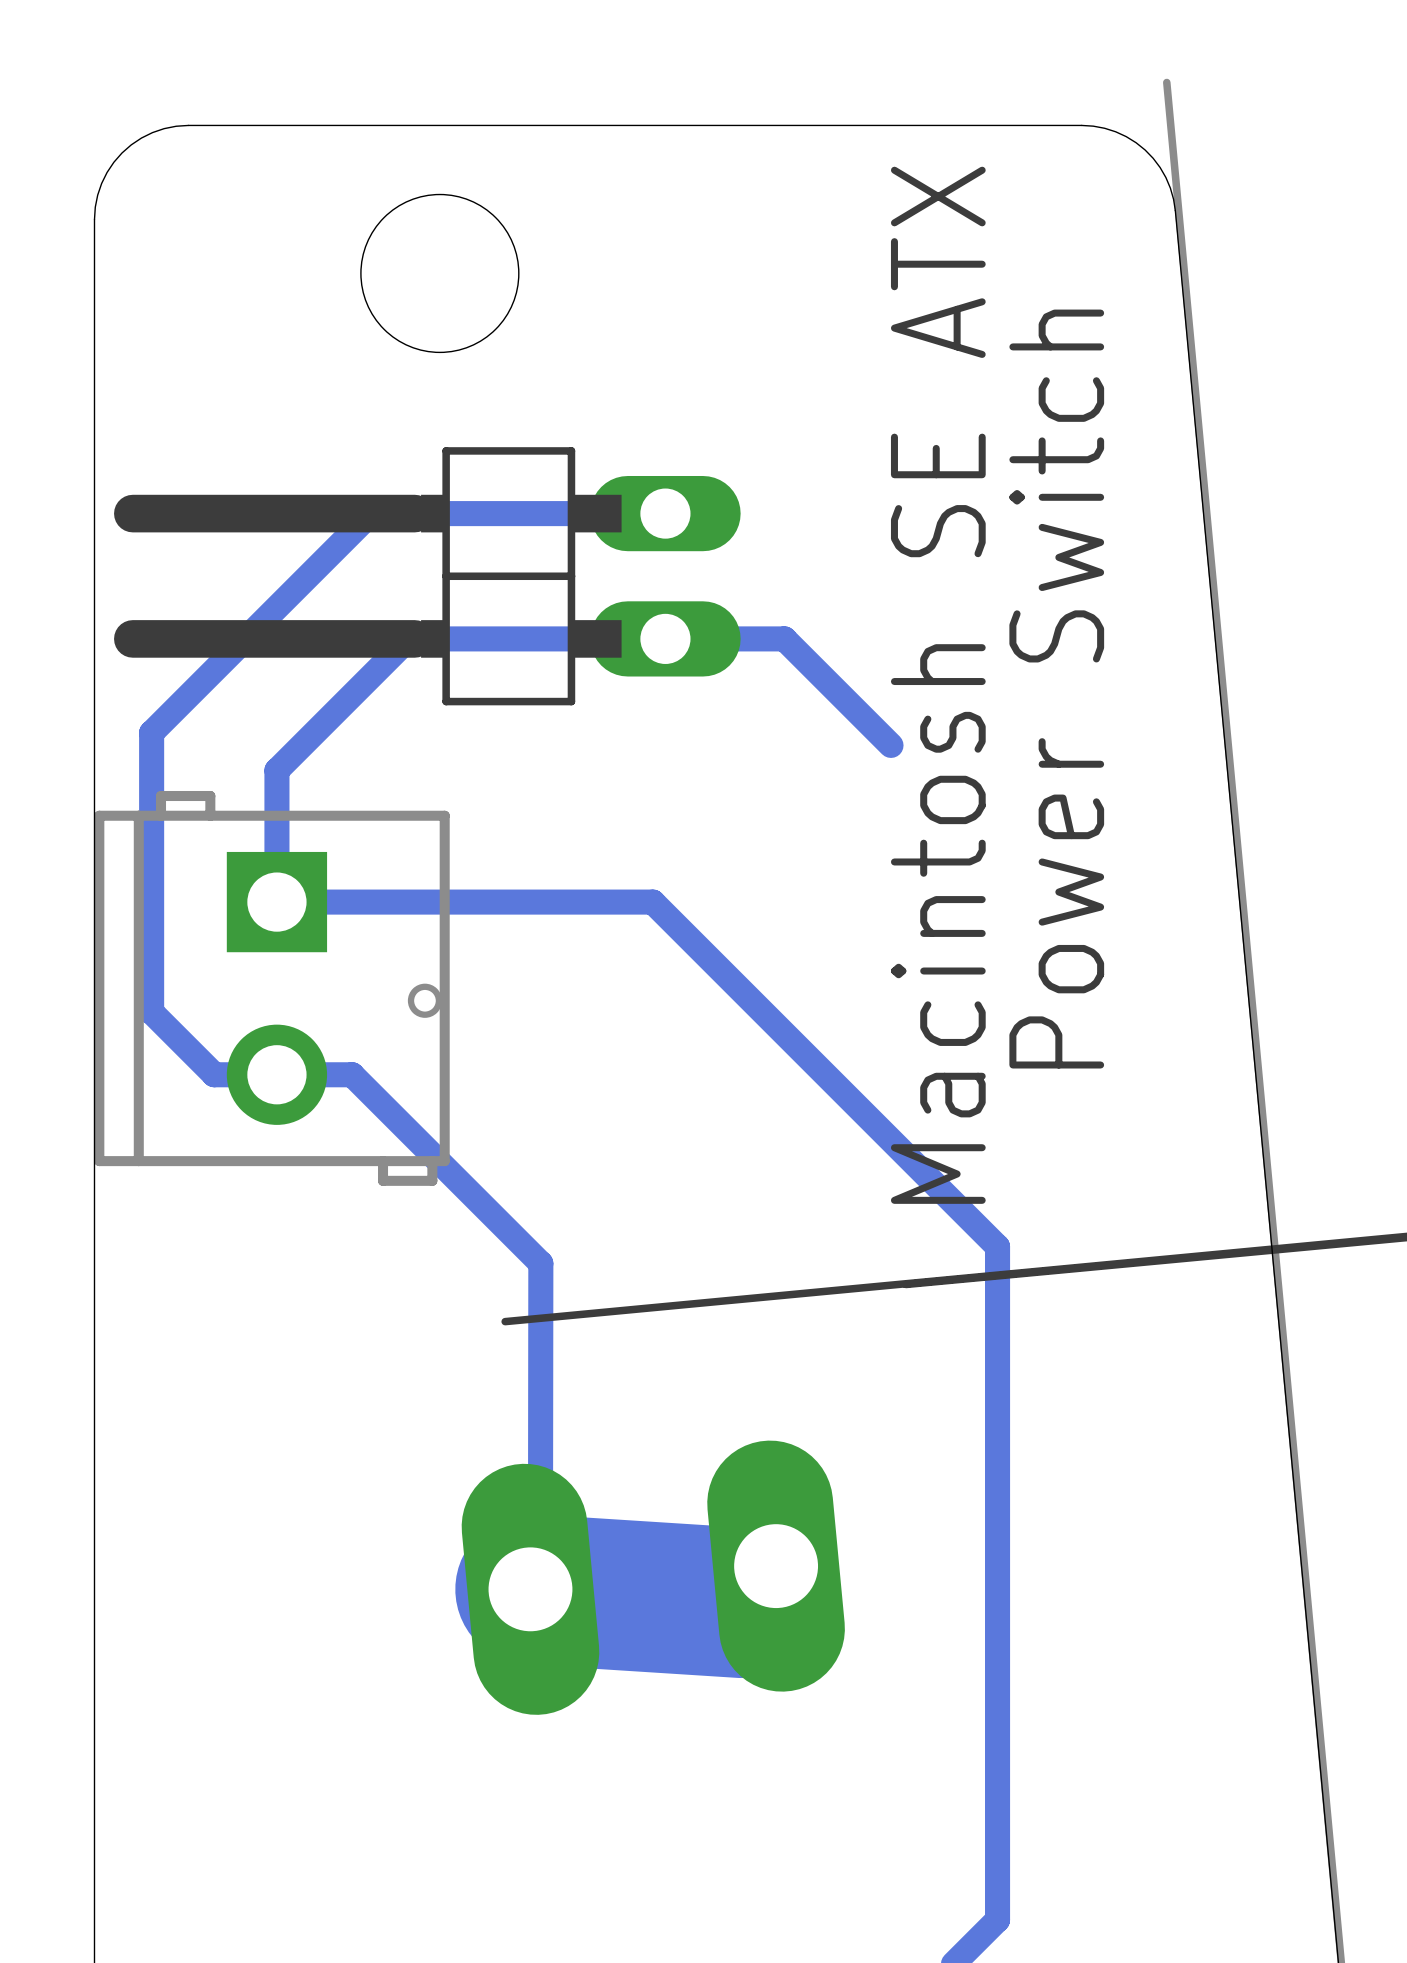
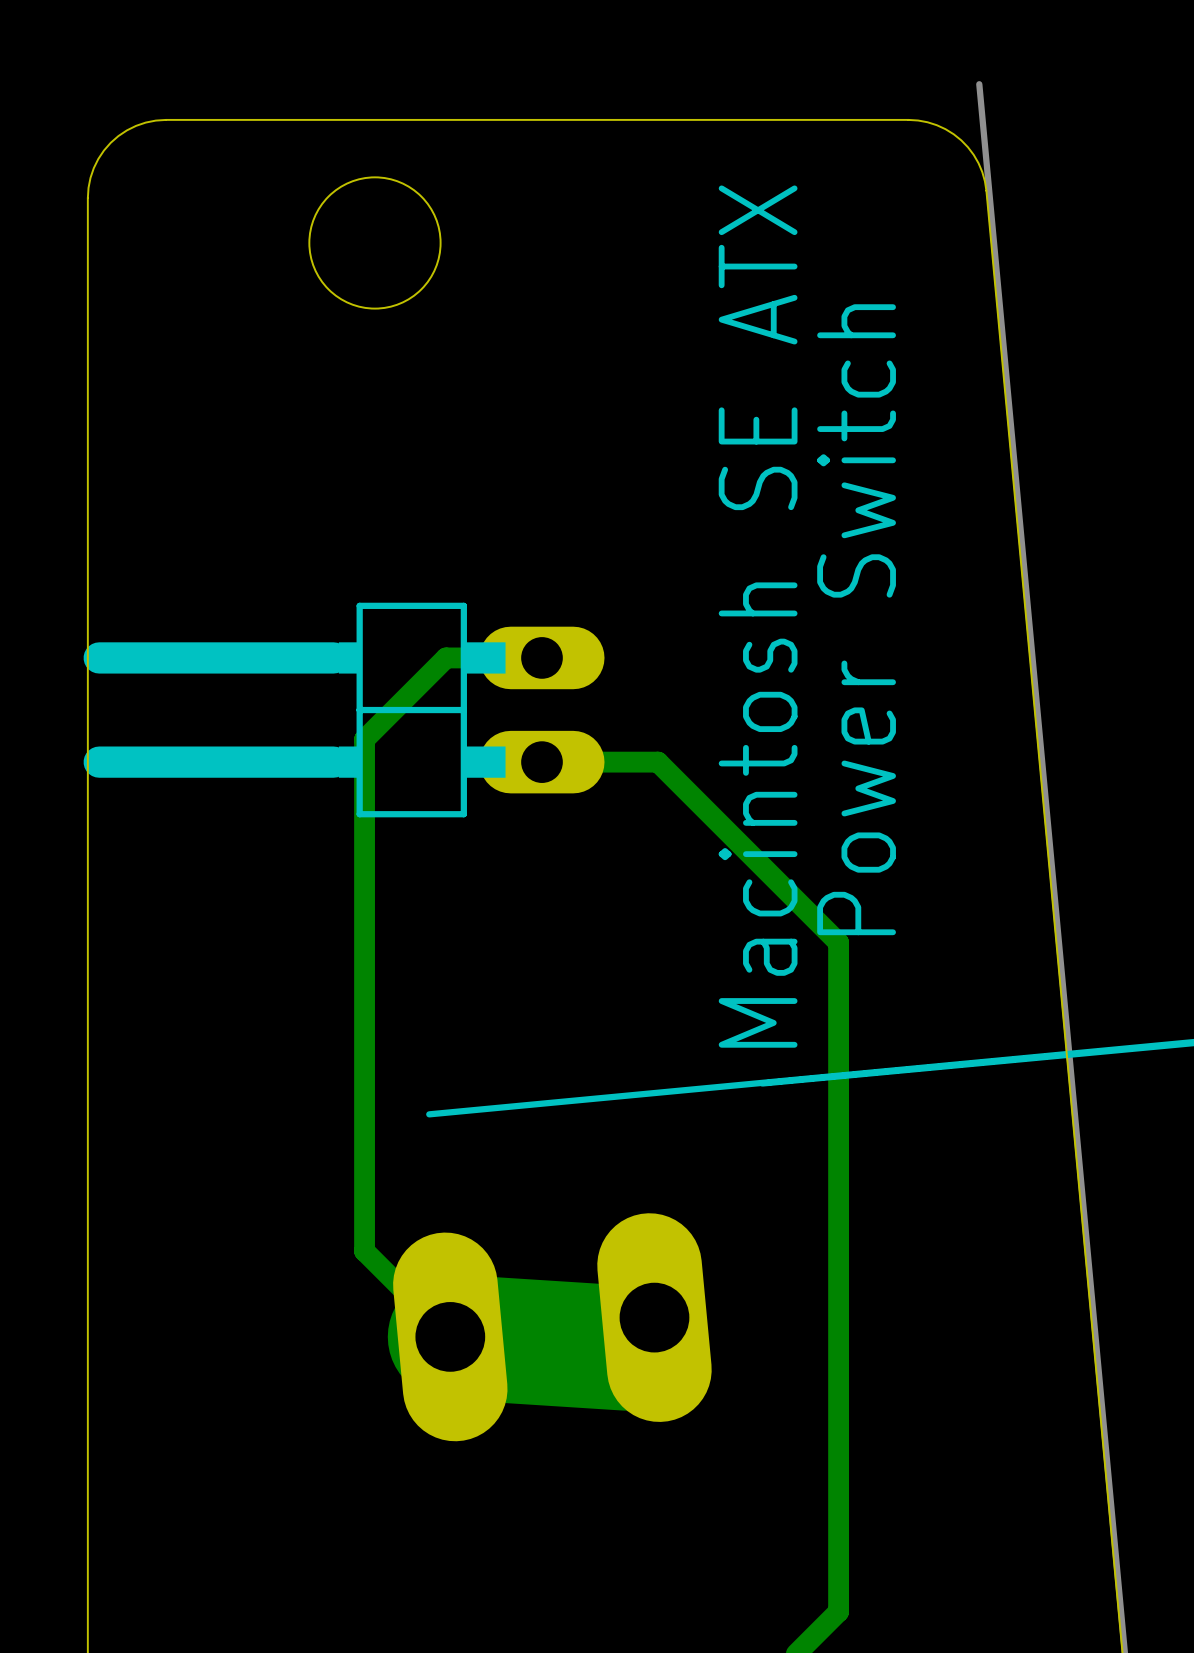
bottom track: (665, 513) (370, 513) (151, 732) (151, 1012) (214, 1074) (352, 1074) (540, 1263) (540, 1564) -> none
part position: (427, 576) -> (344, 710)
text position: Macintosh SE ATX (938, 685) -> Macintosh SE ATX (758, 616)
text position: Power Switch (1056, 689) -> Power Switch (856, 619)
bottom track: (891, 745) (784, 638) (408, 638) (276, 770) (276, 902) (652, 902) (997, 1246) -> (541, 762) (658, 762) (838, 942) (838, 1052)
bottom track: none -> (541, 657) (446, 657) (364, 739) (364, 1251) (450, 1336)
part: (272, 988) -> none

